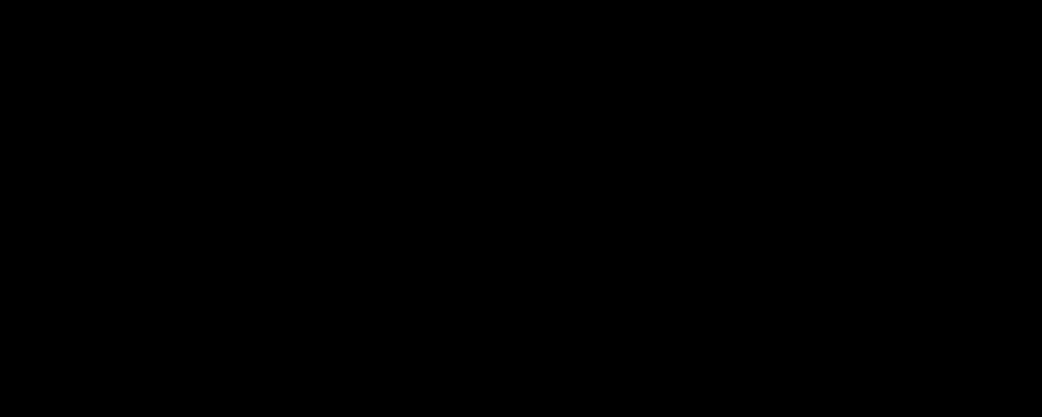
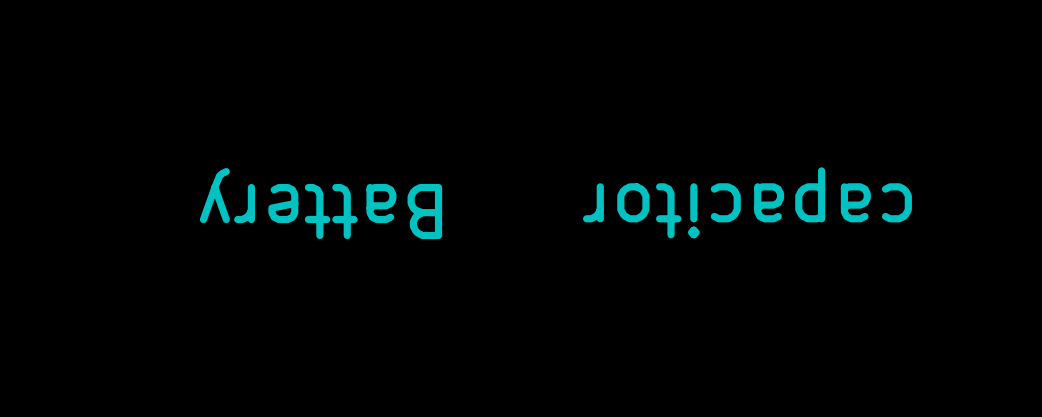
text: none -> capacitor (747, 202)
text: none -> Battery (321, 203)

